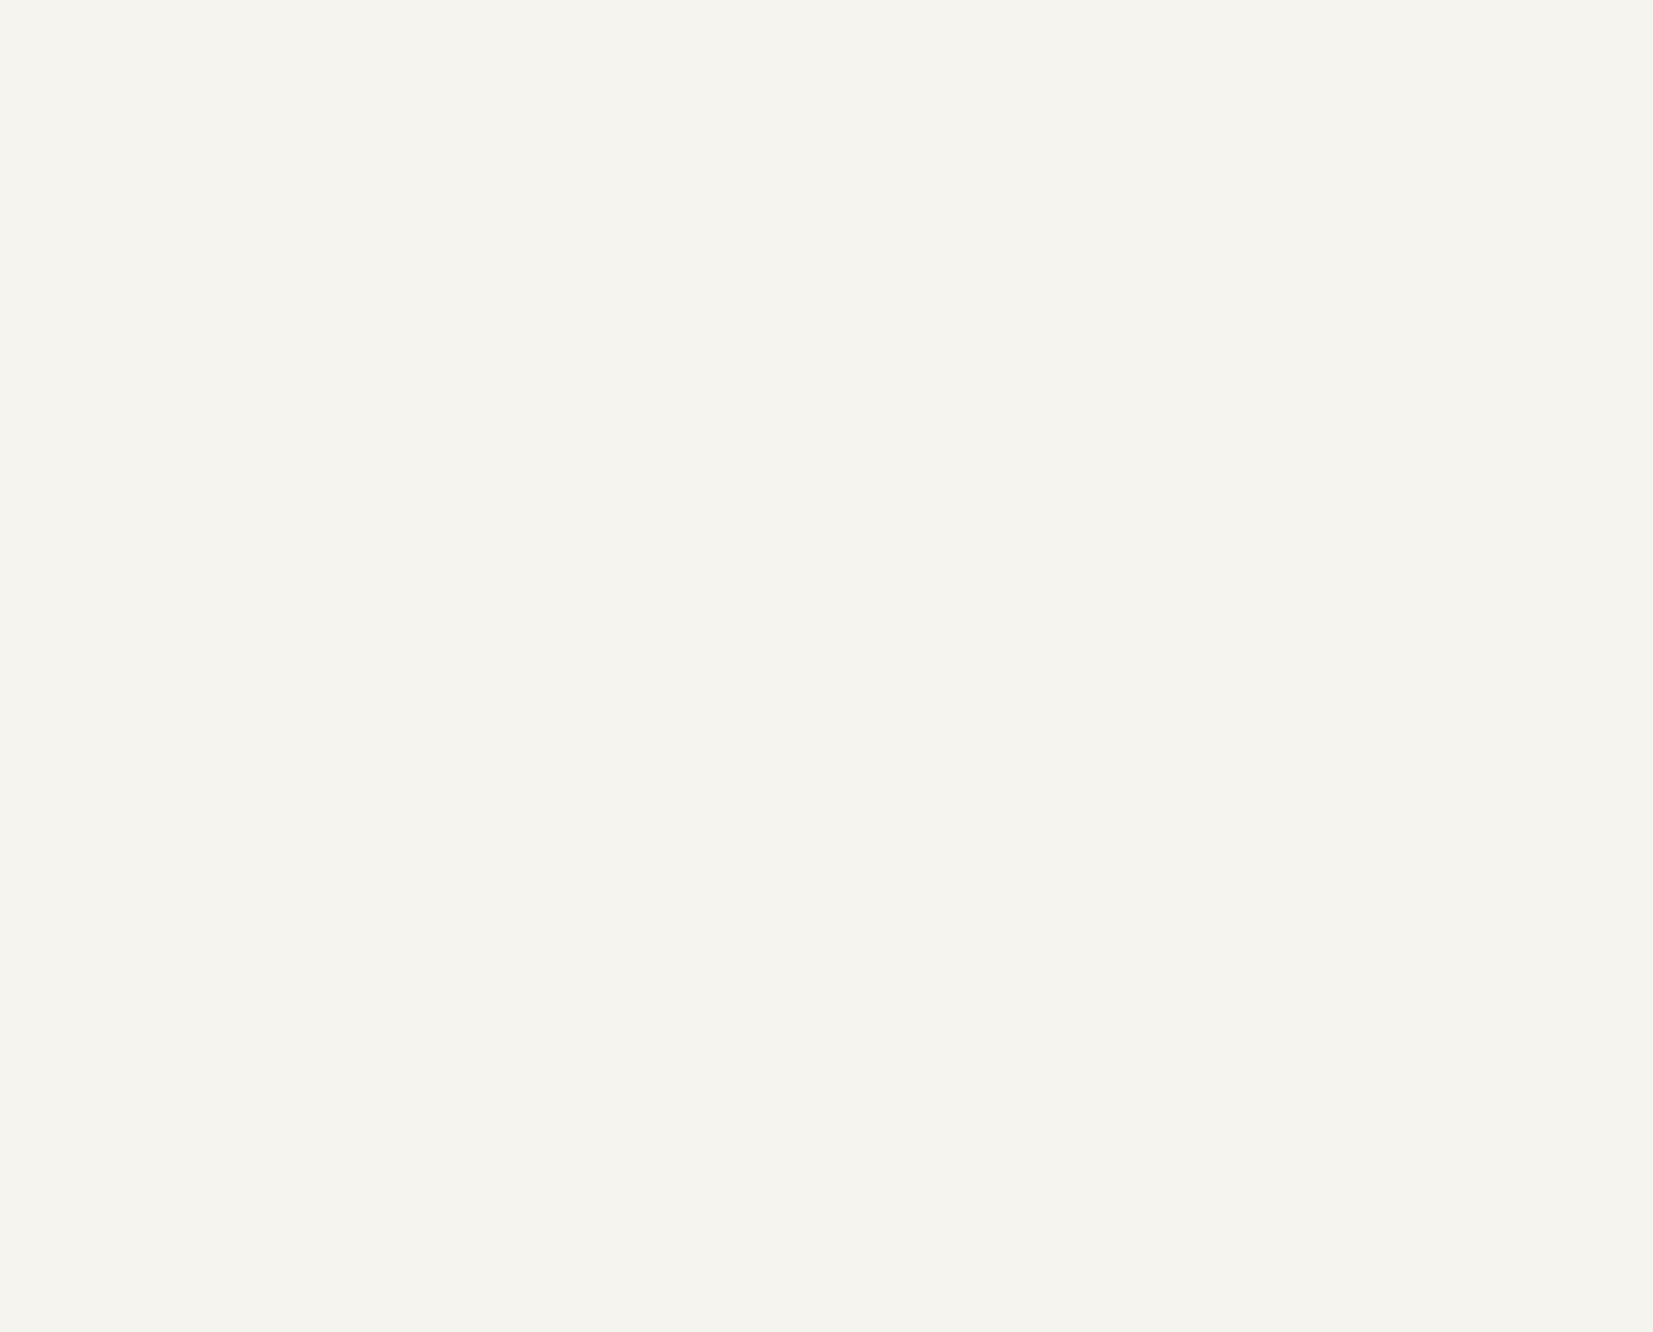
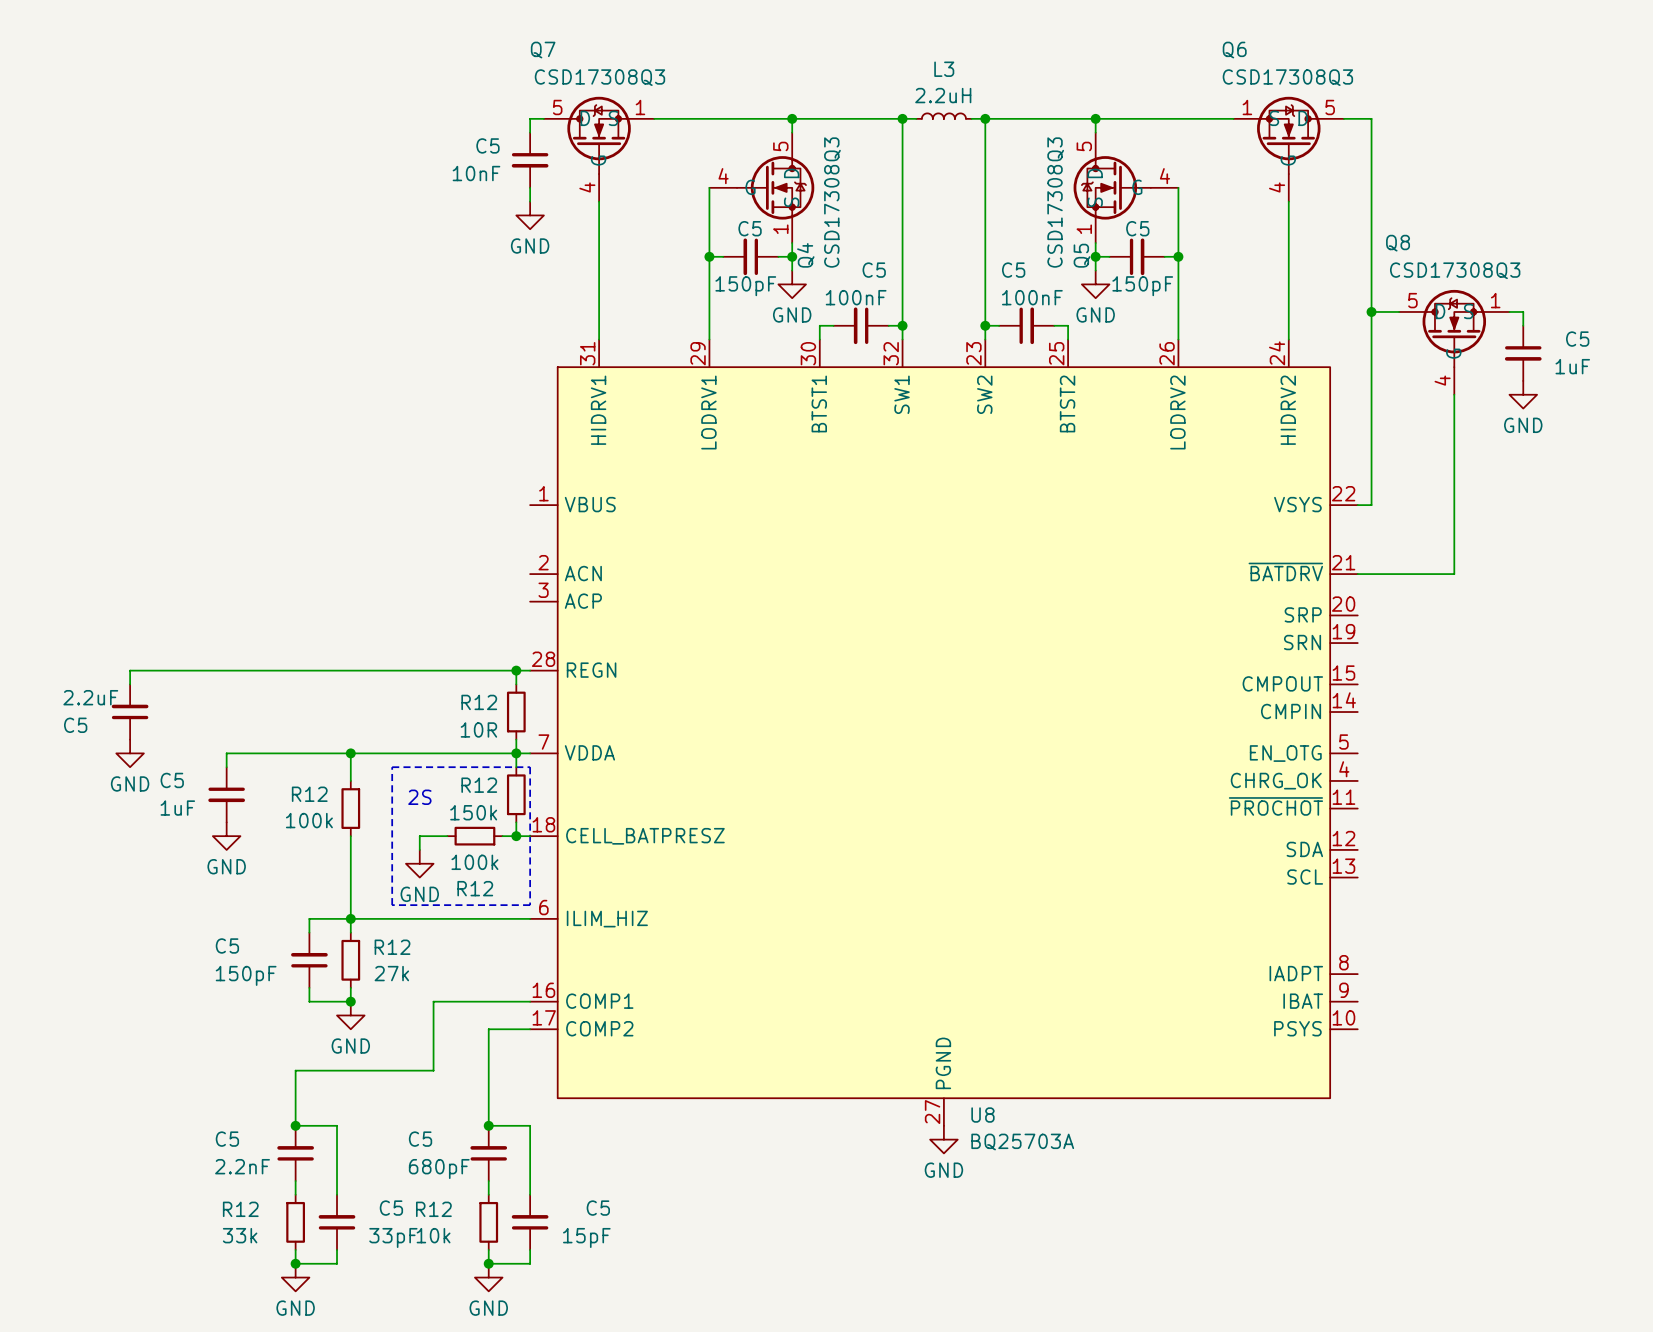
L3: none -> 2.2uH (943, 116)
wire: none -> (543, 118) (530, 118) (530, 132)
wire: none -> (654, 118) (916, 118)
wire: none -> (792, 118) (792, 132)
junction: none -> (792, 118)
wire: none -> (902, 118) (902, 339)
junction: none -> (902, 118)
wire: none -> (971, 118) (1233, 118)
wire: none -> (985, 118) (985, 339)
junction: none -> (985, 118)
wire: none -> (1095, 118) (1095, 132)
junction: none -> (1095, 118)
wire: none -> (1343, 118) (1371, 118) (1371, 505) (1357, 505)
Q7: none -> CSD17308Q3 (599, 149)
Q6: none -> CSD17308Q3 (1288, 149)
C5: none -> 10nF (530, 160)
wire: none -> (530, 187) (530, 201)
wire: none -> (709, 187) (709, 339)
Q4: none -> CSD17308Q3 (761, 187)
Q5: none -> CSD17308Q3 (1126, 187)
wire: none -> (1178, 187) (1178, 339)
wire: none -> (599, 201) (599, 339)
wire: none -> (1288, 201) (1288, 339)
power symbol: none -> GND (530, 215)
wire: none -> (792, 243) (792, 270)
wire: none -> (1095, 243) (1095, 270)
wire: none -> (709, 256) (723, 256)
junction: none -> (709, 256)
C5: none -> 150pF (750, 256)
wire: none -> (778, 256) (792, 256)
junction: none -> (792, 256)
wire: none -> (1095, 256) (1109, 256)
junction: none -> (1095, 256)
C5: none -> 150pF (1137, 256)
wire: none -> (1164, 256) (1178, 256)
junction: none -> (1178, 256)
power symbol: none -> GND (792, 284)
power symbol: none -> GND (1095, 284)
wire: none -> (1371, 311) (1399, 311)
junction: none -> (1371, 311)
wire: none -> (1509, 311) (1523, 311) (1523, 325)
wire: none -> (833, 325) (819, 325) (819, 339)
C5: none -> 100nF (861, 325)
wire: none -> (888, 325) (902, 325)
junction: none -> (902, 325)
wire: none -> (985, 325) (999, 325)
junction: none -> (985, 325)
C5: none -> 100nF (1026, 325)
wire: none -> (1054, 325) (1068, 325) (1068, 339)
Q8: none -> CSD17308Q3 (1454, 342)
C5: none -> 1uF (1523, 353)
wire: none -> (1454, 394) (1454, 574) (1357, 574)
power symbol: none -> GND (1523, 394)
wire: none -> (516, 670) (516, 684)
junction: none -> (516, 670)
wire: none -> (530, 670) (130, 670) (130, 684)
C5: none -> 2.2uF (130, 712)
R12: none -> 10R (516, 712)
U8: none -> BQ25703A (943, 732)
wire: none -> (516, 739) (516, 767)
power symbol: none -> GND (130, 753)
wire: none -> (350, 753) (350, 780)
junction: none -> (350, 753)
junction: none -> (516, 753)
wire: none -> (530, 753) (226, 753) (226, 767)
line: none -> (392, 767) (530, 767) (530, 905) (392, 905) (392, 767)
C5: none -> 1uF (226, 794)
R12: none -> 150k (516, 794)
text: none -> 2S (419, 797)
R12: none -> 100k (350, 808)
wire: none -> (516, 822) (516, 836)
power symbol: none -> GND (226, 836)
wire: none -> (350, 836) (350, 932)
wire: none -> (447, 836) (419, 836) (419, 849)
R12: none -> 100k (474, 836)
wire: none -> (502, 836) (530, 836)
junction: none -> (516, 836)
power symbol: none -> GND (419, 863)
junction: none -> (350, 918)
wire: none -> (530, 918) (309, 918) (309, 932)
C5: none -> 150pF (309, 960)
R12: none -> 27k (350, 960)
wire: none -> (309, 987) (309, 1001) (350, 1001) (350, 987)
junction: none -> (350, 1001)
wire: none -> (530, 1001) (433, 1001) (433, 1070) (295, 1070) (295, 1125) (337, 1125) (337, 1194)
power symbol: none -> GND (350, 1015)
wire: none -> (530, 1029) (488, 1029) (488, 1125) (530, 1125) (530, 1194)
junction: none -> (295, 1125)
junction: none -> (488, 1125)
power symbol: none -> GND (943, 1139)
C5: none -> 2.2nF (295, 1153)
C5: none -> 680pF (488, 1153)
wire: none -> (295, 1181) (295, 1194)
wire: none -> (488, 1181) (488, 1194)
R12: none -> 33k (295, 1222)
C5: none -> 33pF (337, 1222)
R12: none -> 10k (488, 1222)
C5: none -> 15pF (530, 1222)
wire: none -> (295, 1249) (295, 1263) (337, 1263) (337, 1249)
wire: none -> (488, 1249) (488, 1263) (530, 1263) (530, 1249)
junction: none -> (295, 1263)
junction: none -> (488, 1263)
power symbol: none -> GND (295, 1277)
power symbol: none -> GND (488, 1277)

